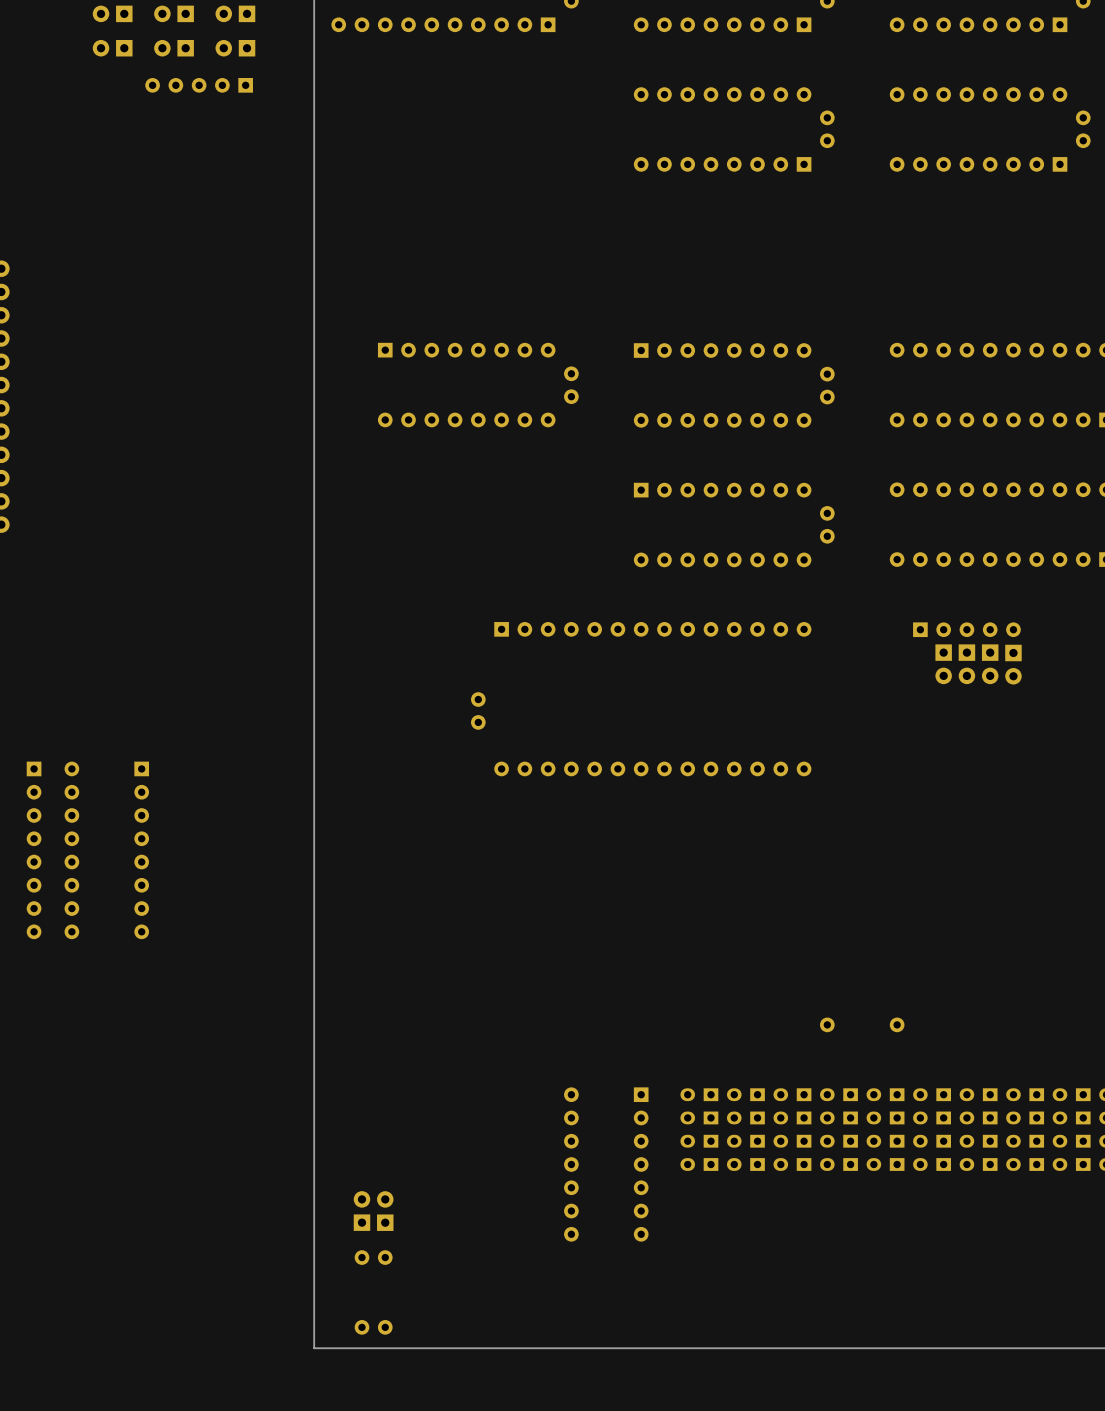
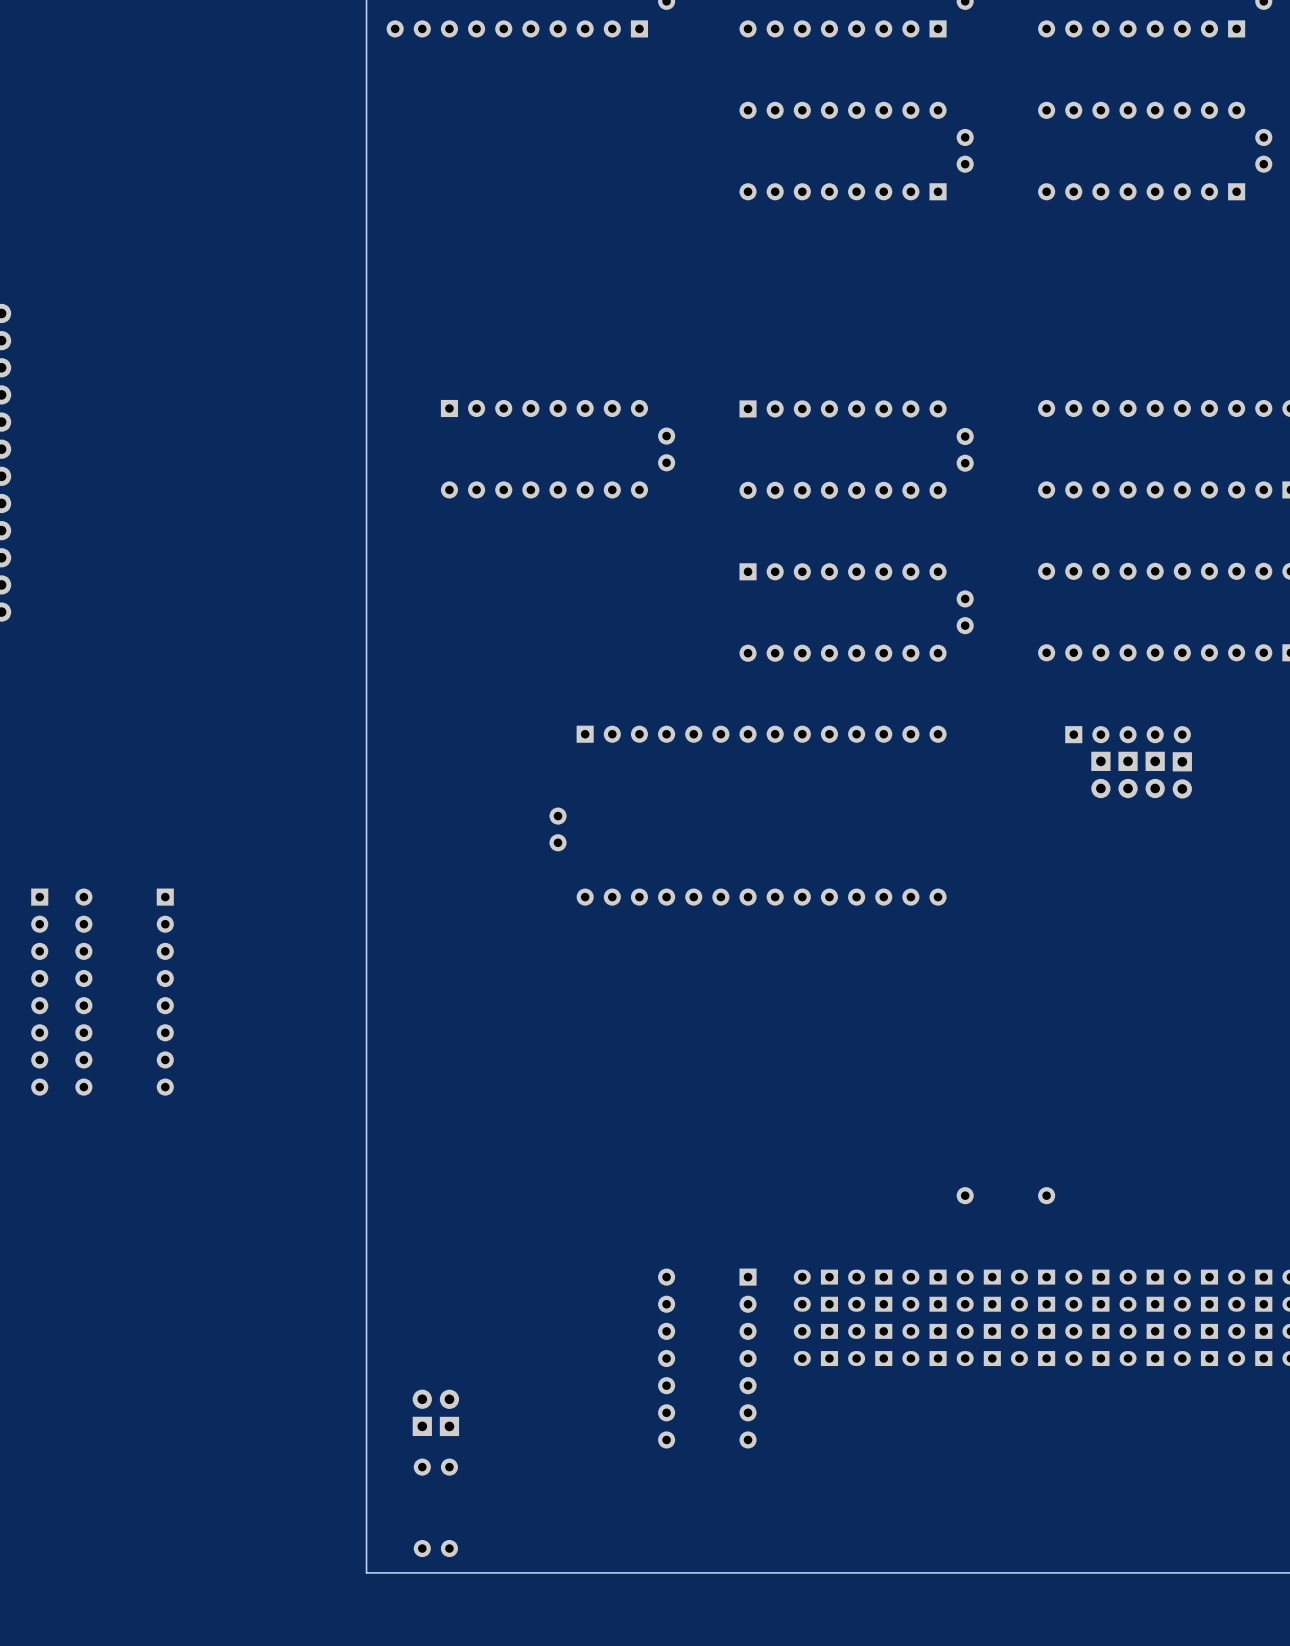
part: (112, 13) -> none
part: (174, 13) -> none
part: (235, 13) -> none
part: (112, 48) -> none
part: (174, 48) -> none
part: (235, 48) -> none
part: (199, 85) -> none

